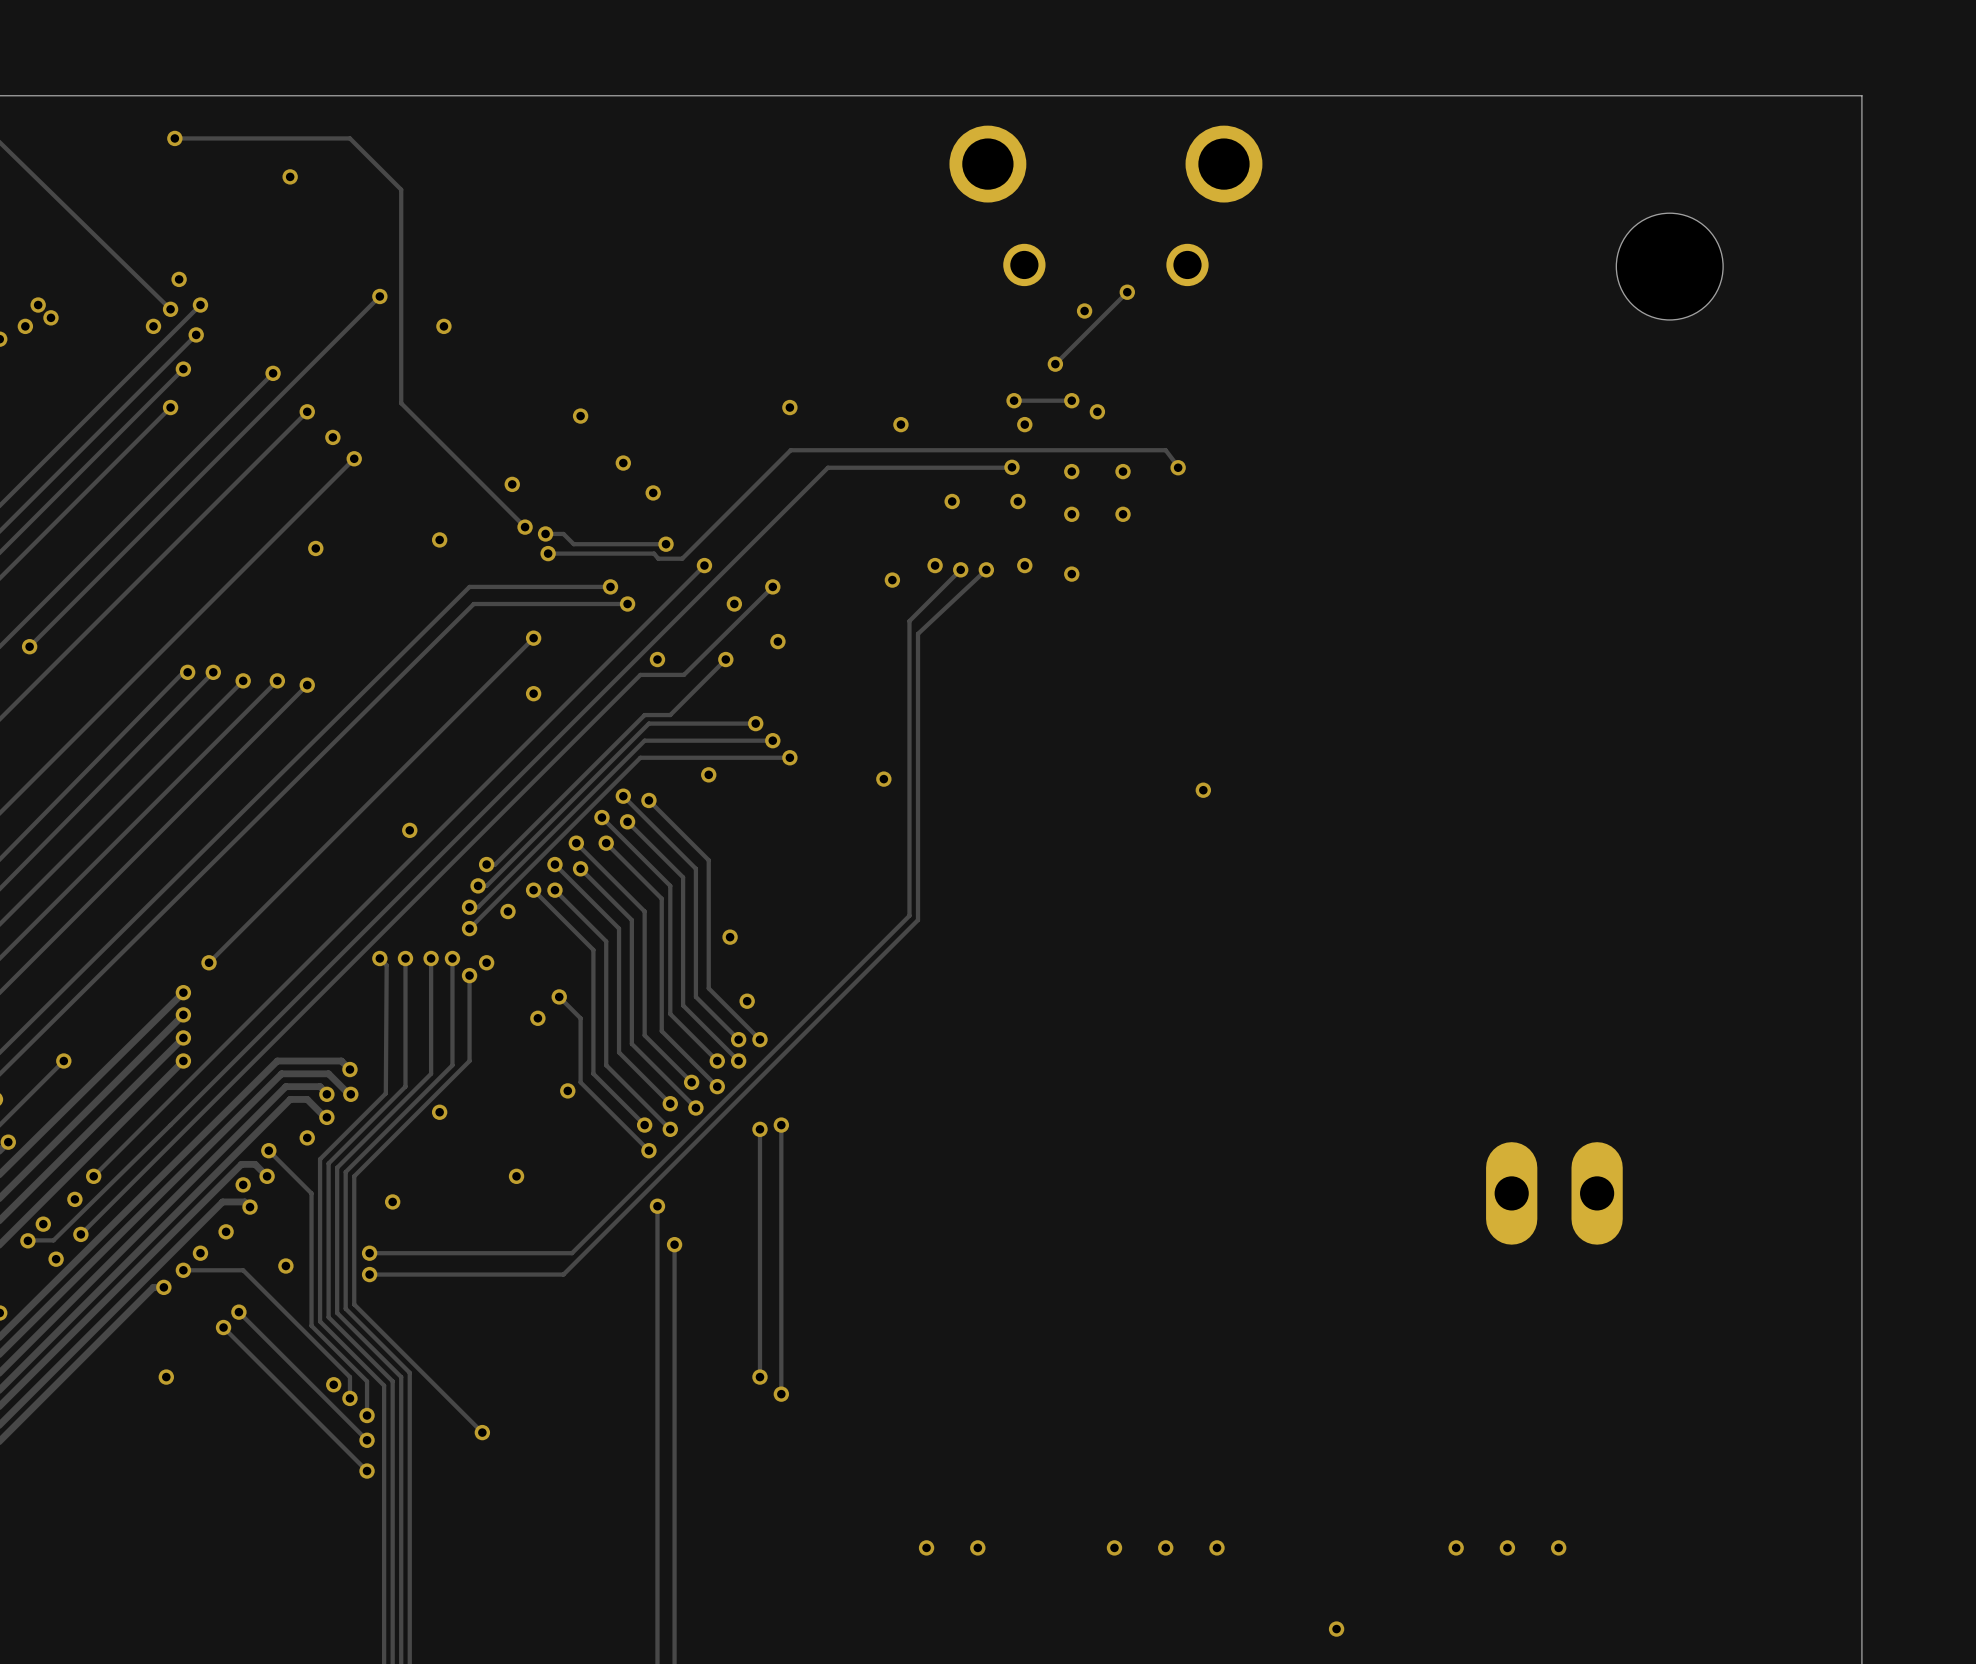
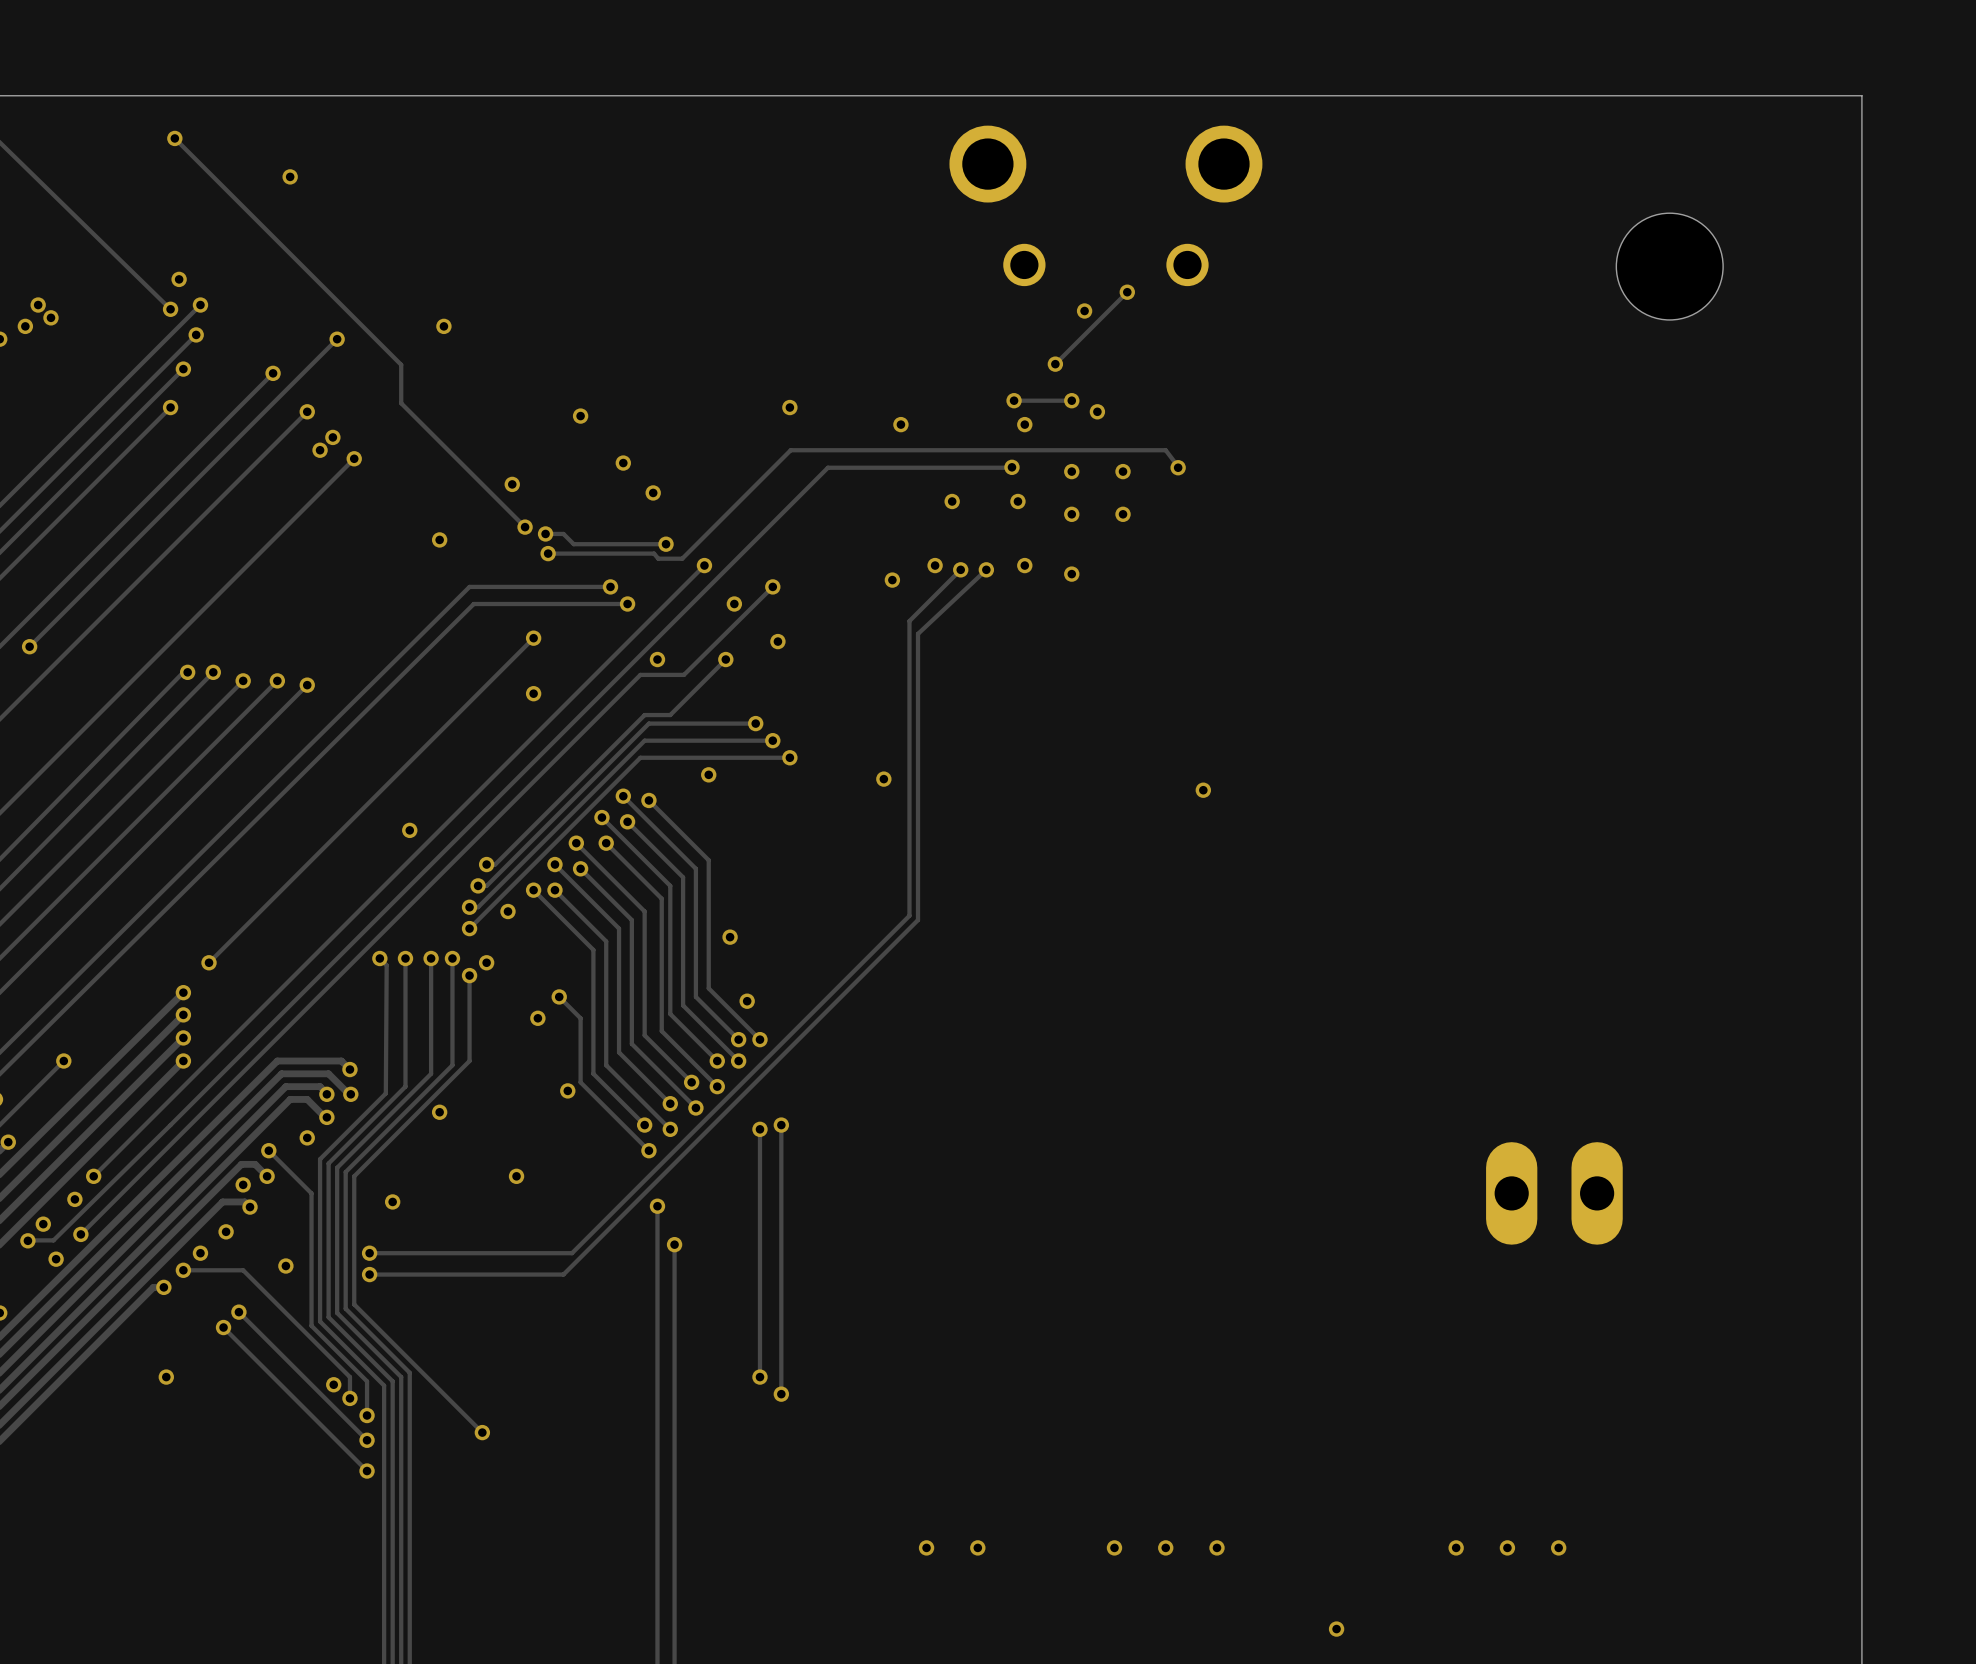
track: (174, 138) (349, 138) (401, 189) (401, 364) -> (174, 138) (401, 364)
track: (379, 296) (337, 339) -> none
via position: (379, 296) -> (337, 339)
via: (153, 326) -> none
via: none -> (320, 450)
via: (315, 548) -> none

